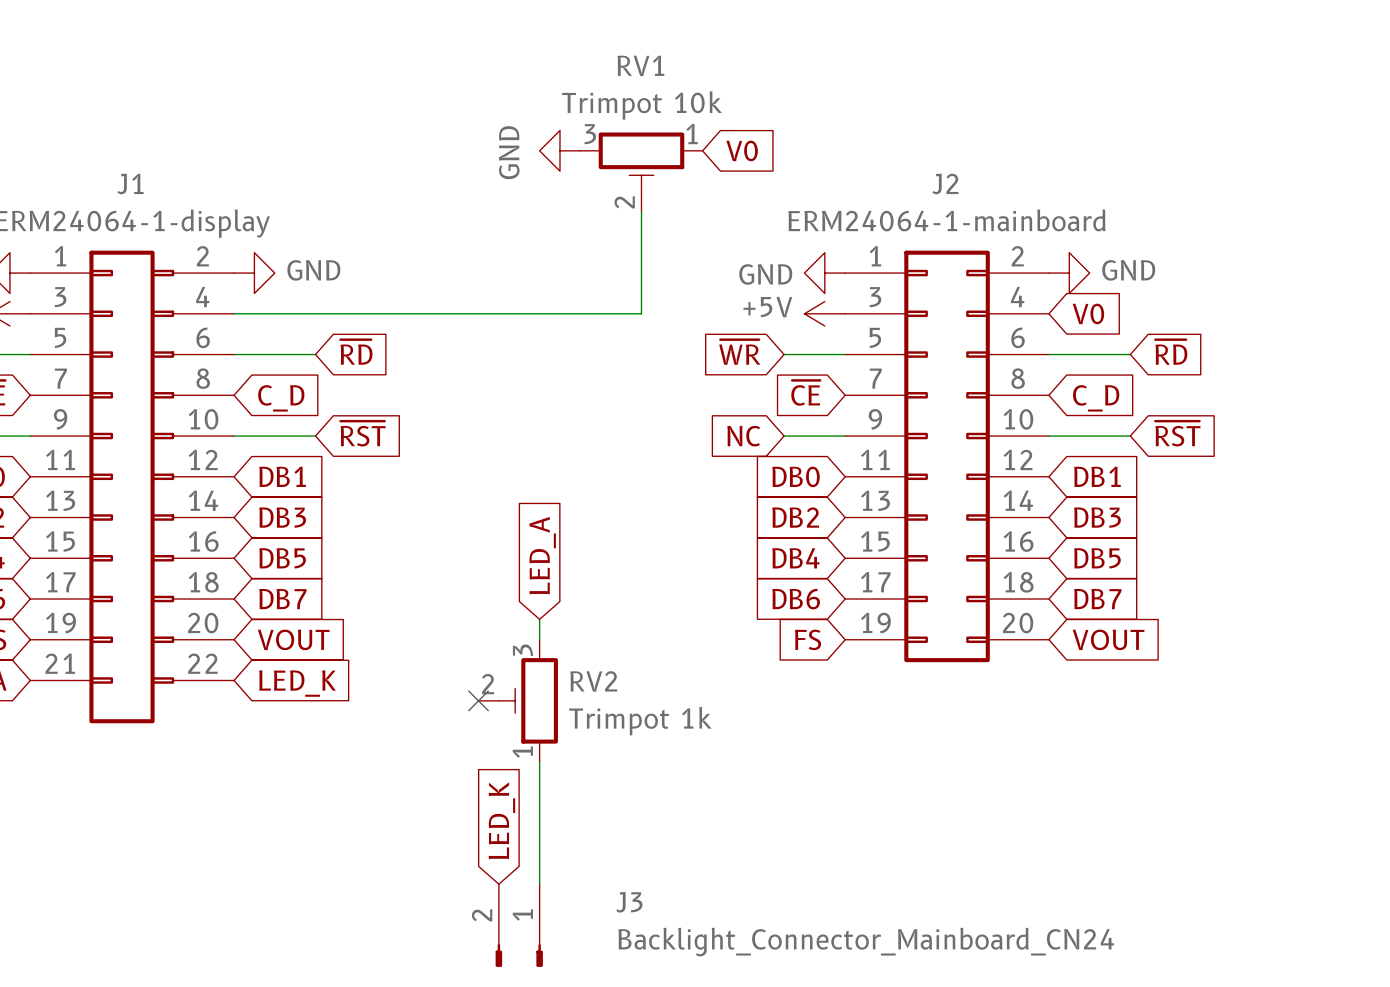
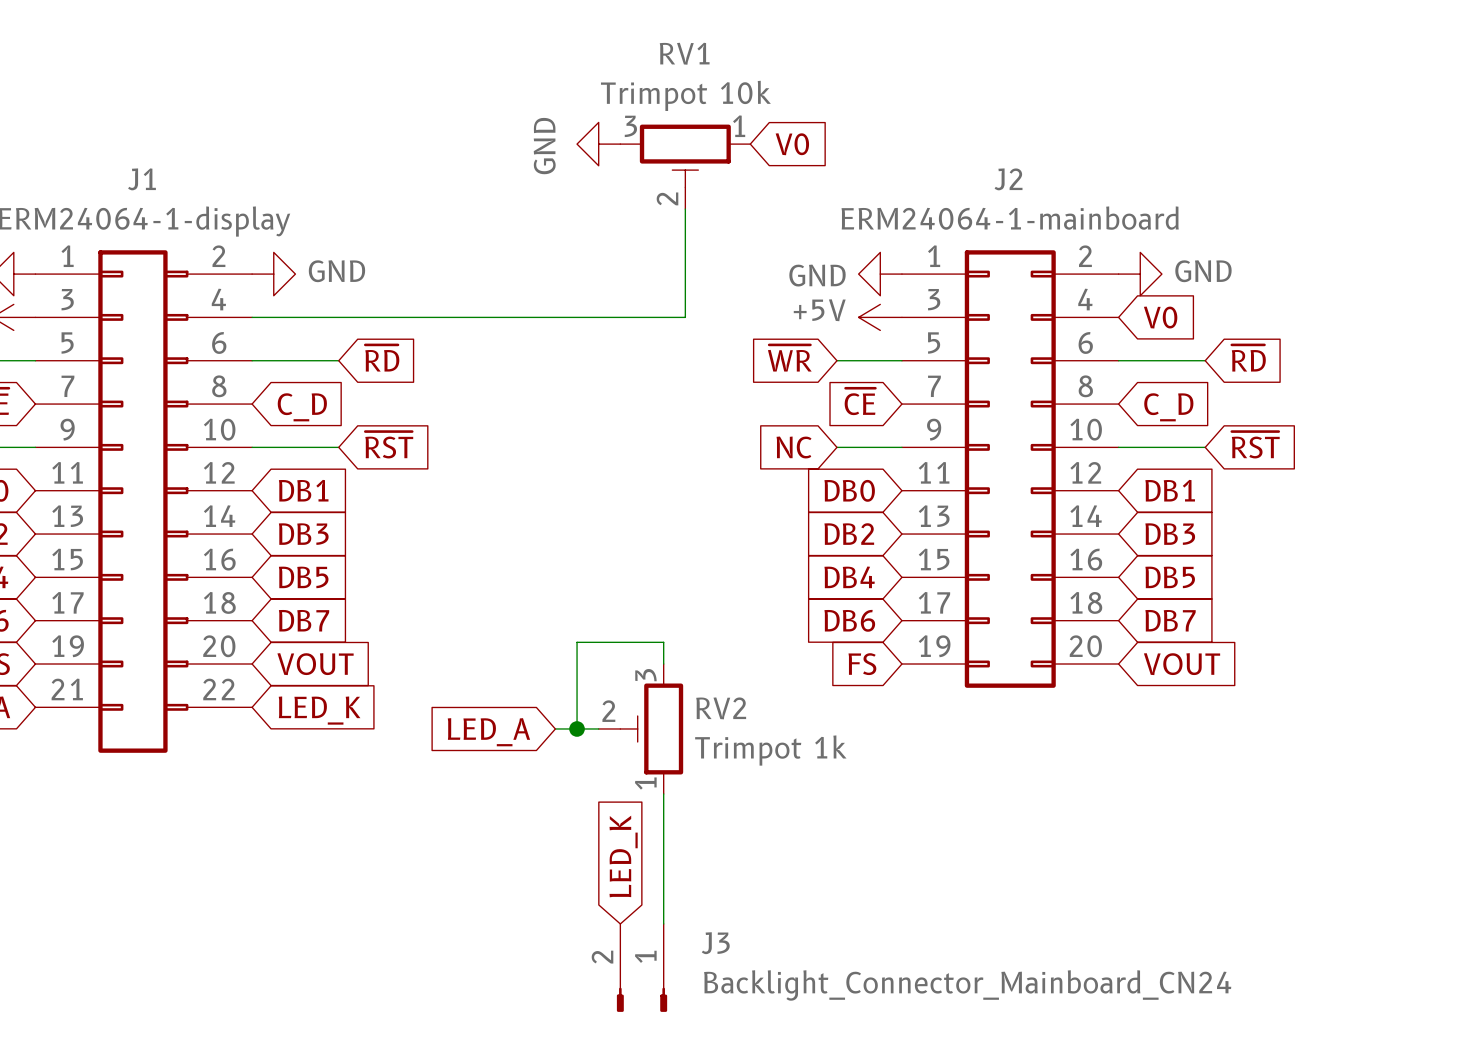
global label rotation: 0° (542, 555) -> 90° counterclockwise (488, 732)
global label position: LED_A (542, 555) -> LED_A (488, 732)
wire: none -> (577, 642) (663, 642) (663, 664)
wire: none -> (577, 664) (577, 728)
no-connect mark: (478, 700) -> none
RV2 position: (518, 700) -> (640, 728)
wire: none -> (555, 728) (598, 728)
junction: none -> (577, 728)
wire: (539, 761) (539, 884) -> (663, 793) (663, 923)
global label position: LED_K (501, 820) -> LED_K (623, 856)
J3 name position: J3 (629, 902) -> J3 (715, 943)
J3 position: (519, 925) -> (642, 967)
J3 value position: Backlight_Connector_Mainboard_CN24 (866, 942) -> Backlight_Connector_Mainboard_CN24 (967, 985)

